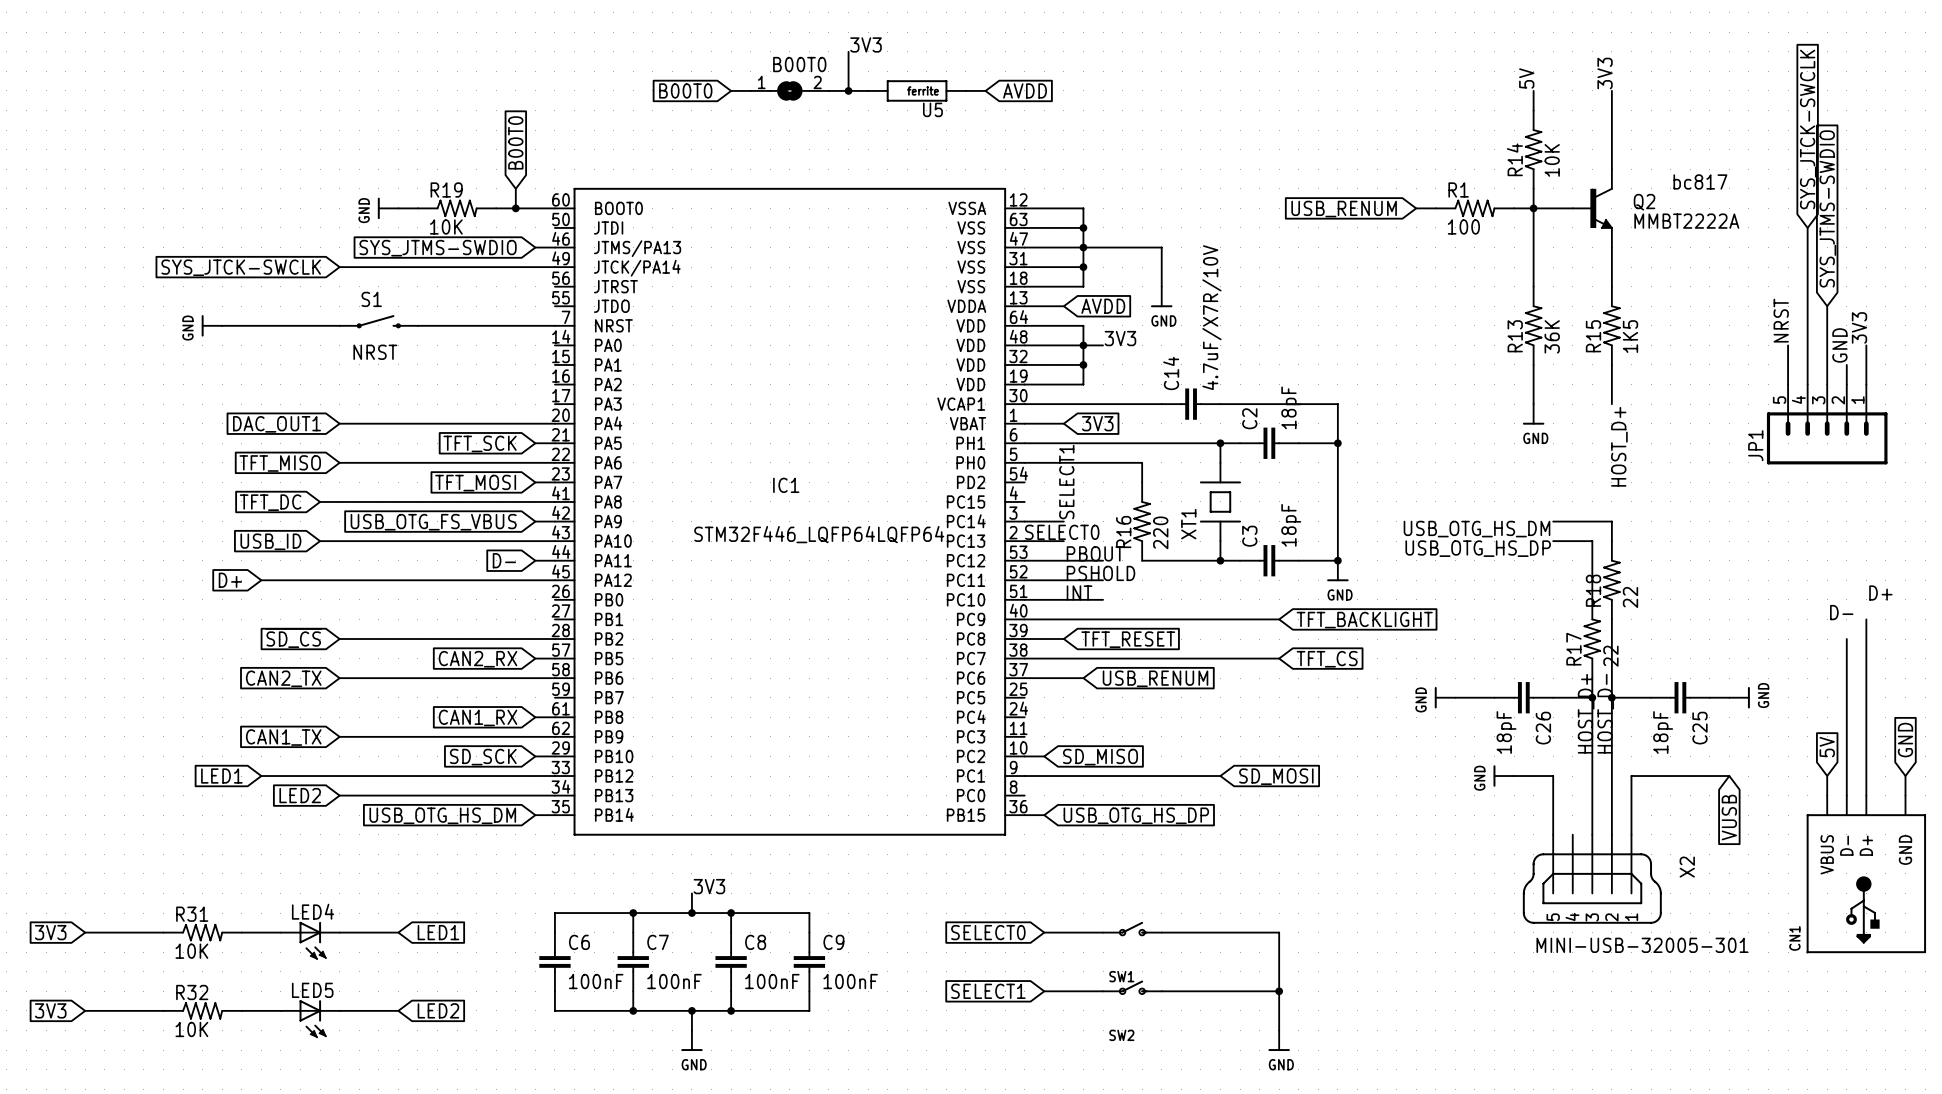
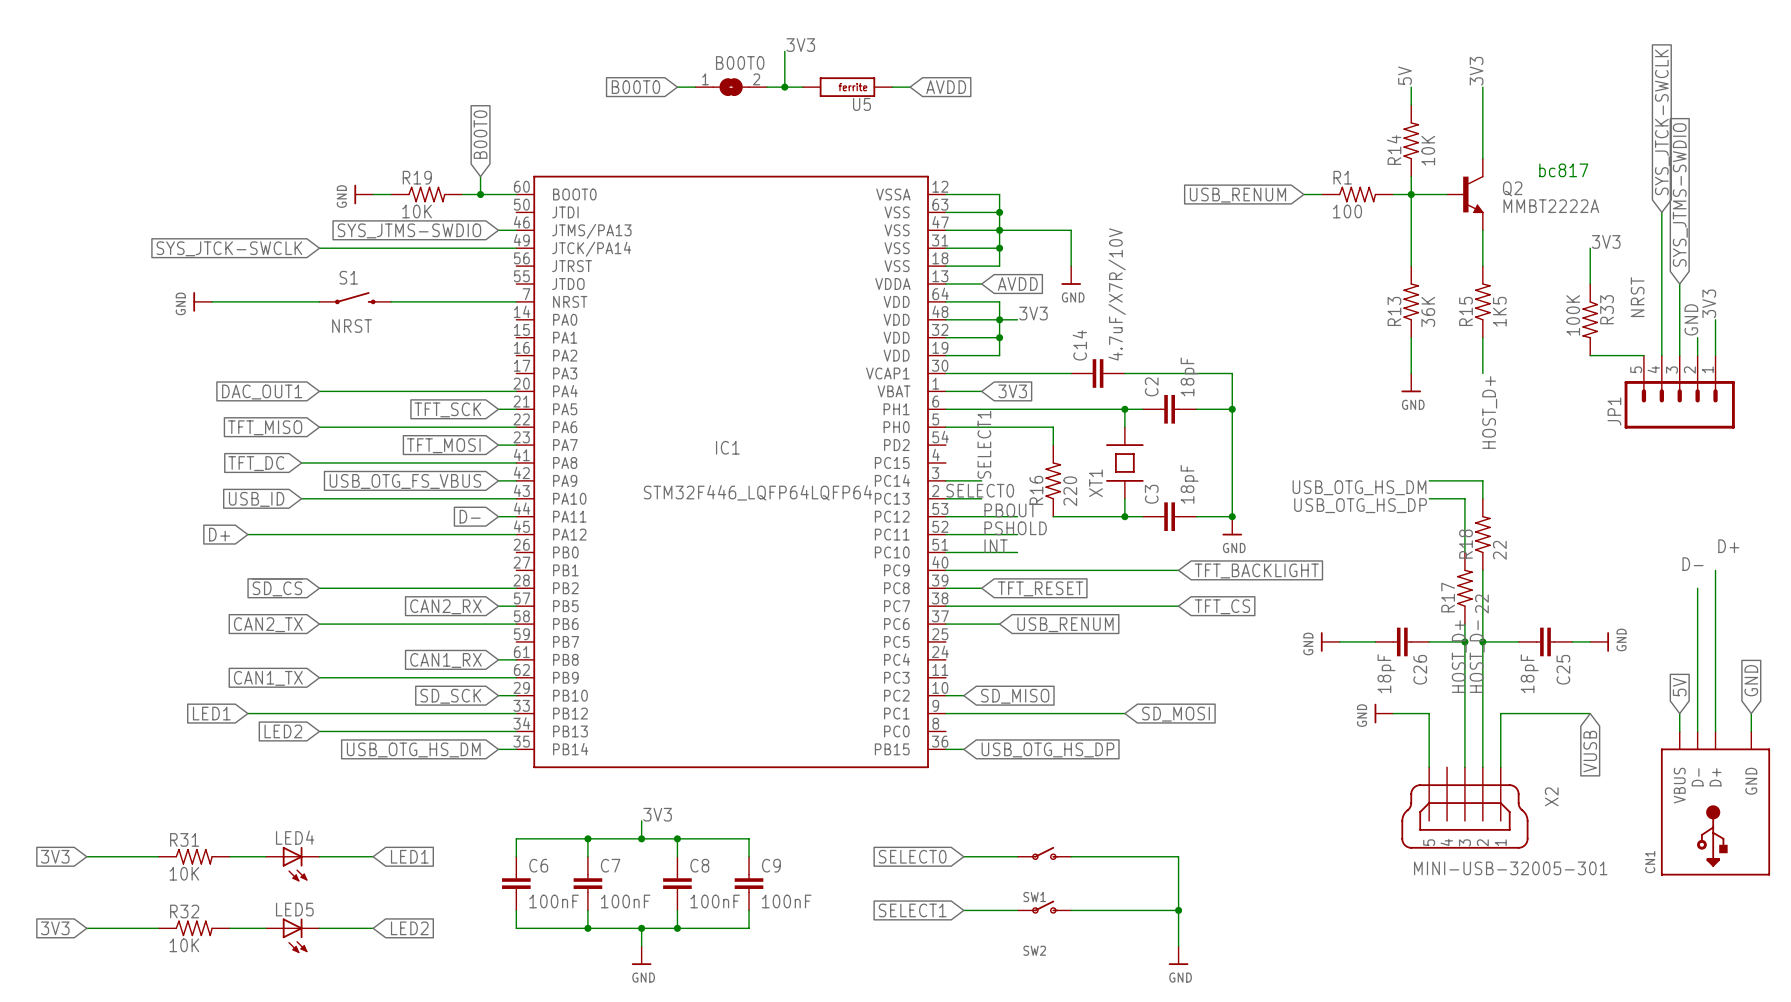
label: none -> 3V3 (1606, 241)
wire: none -> (1590, 248) (1590, 284)
R33: none -> 100K (1590, 319)
wire: (1788, 345) (1788, 384) -> (1590, 355) (1643, 355)

